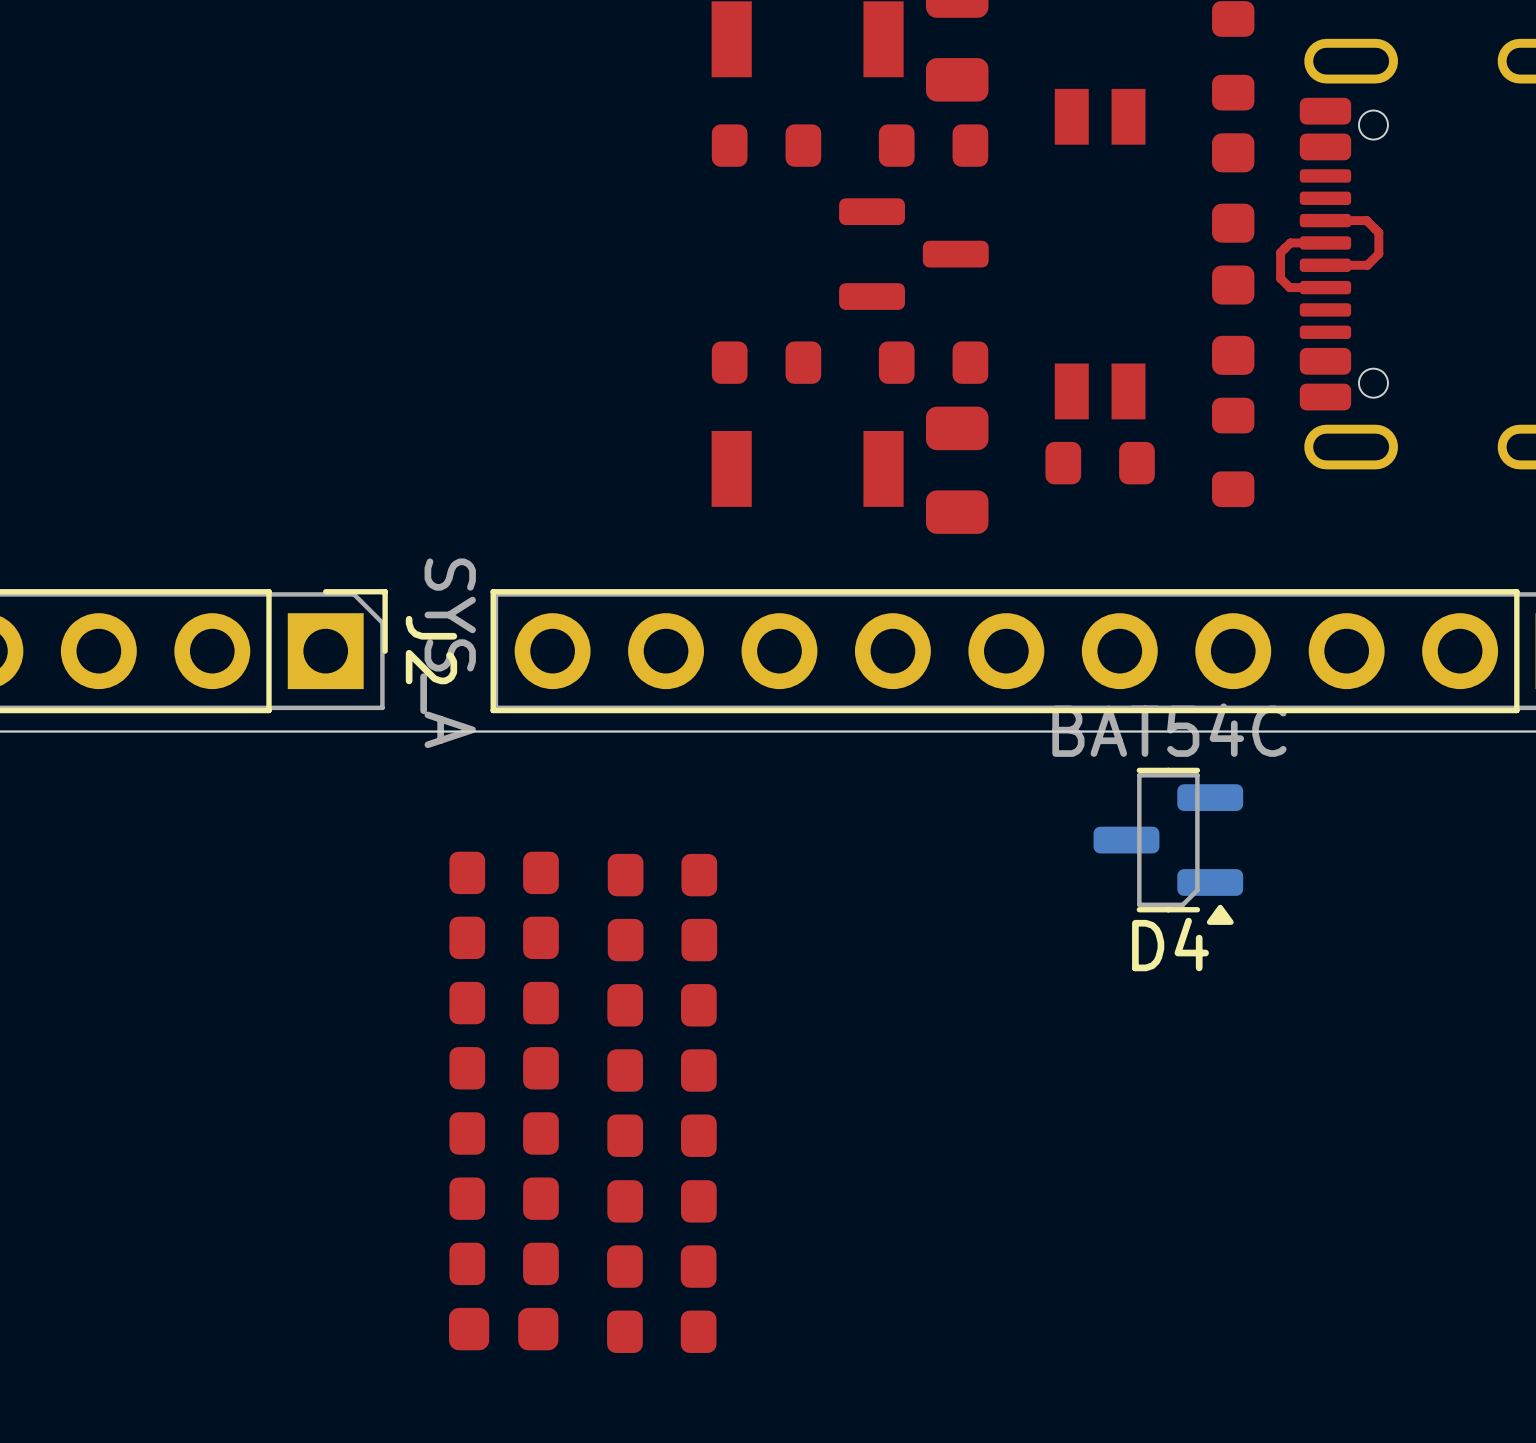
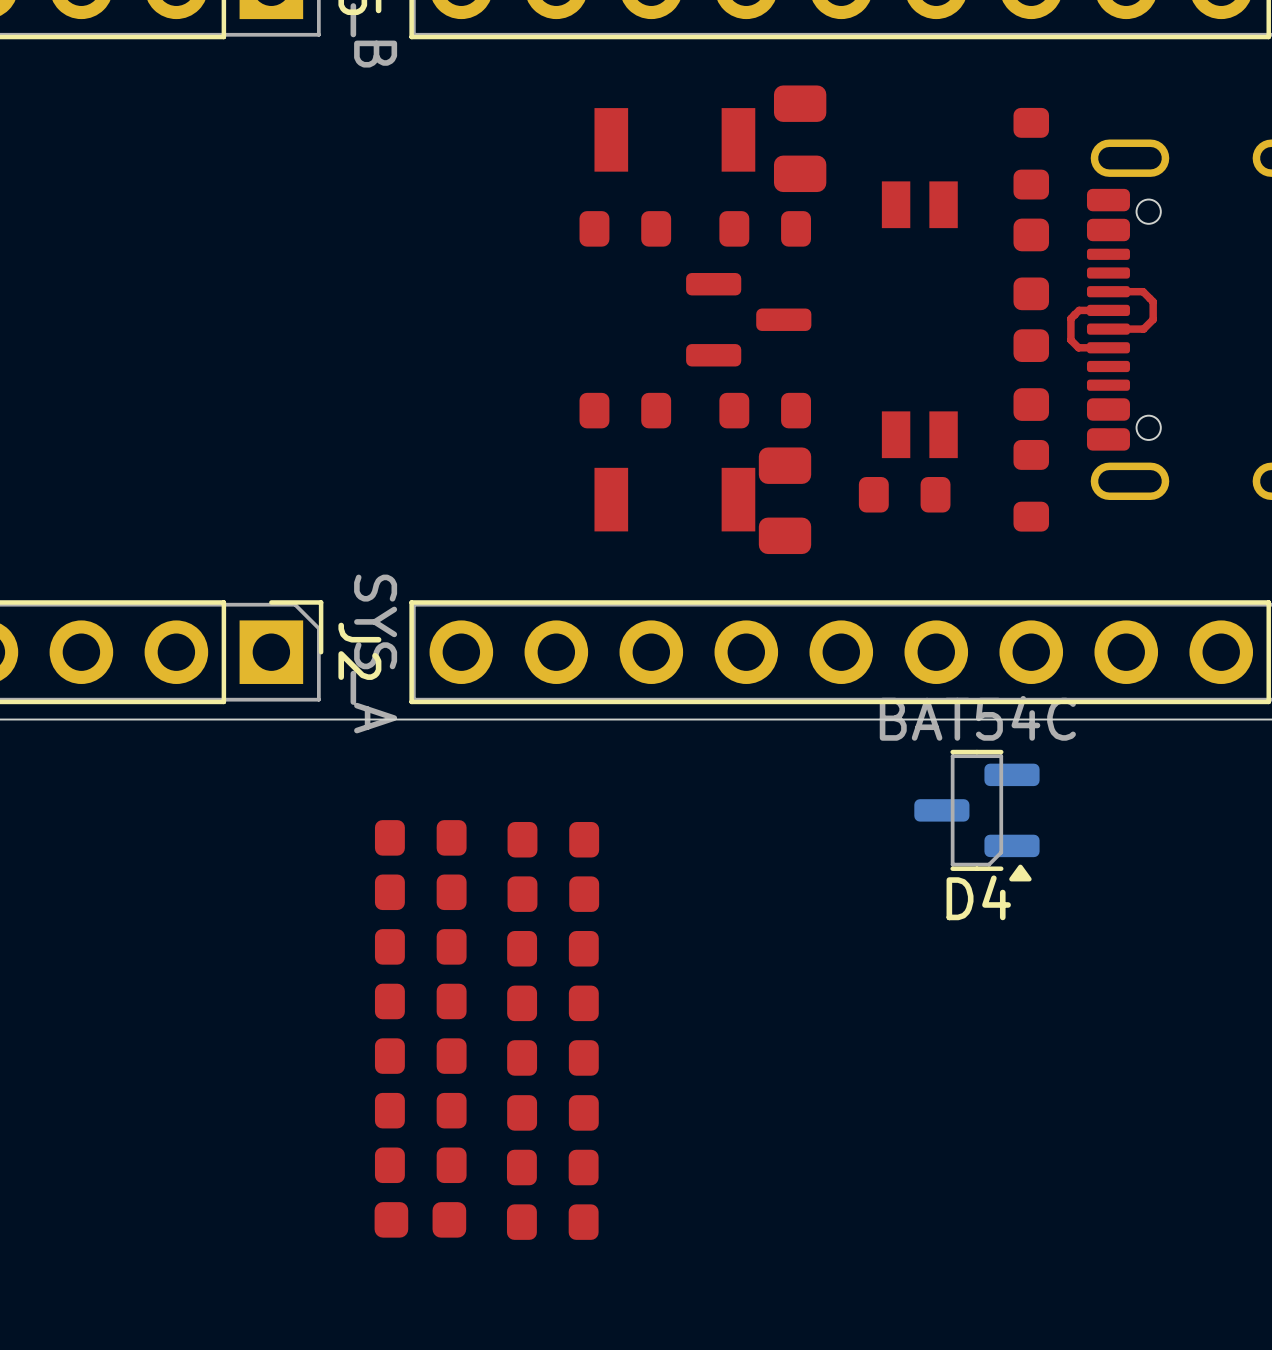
part position: (766, 145) -> (625, 228)
part position: (933, 145) -> (765, 228)
part position: (913, 254) -> (748, 319)
part position: (766, 362) -> (625, 410)
part position: (933, 362) -> (765, 410)
part position: (1100, 463) -> (904, 494)
part position: (957, 470) -> (785, 500)

